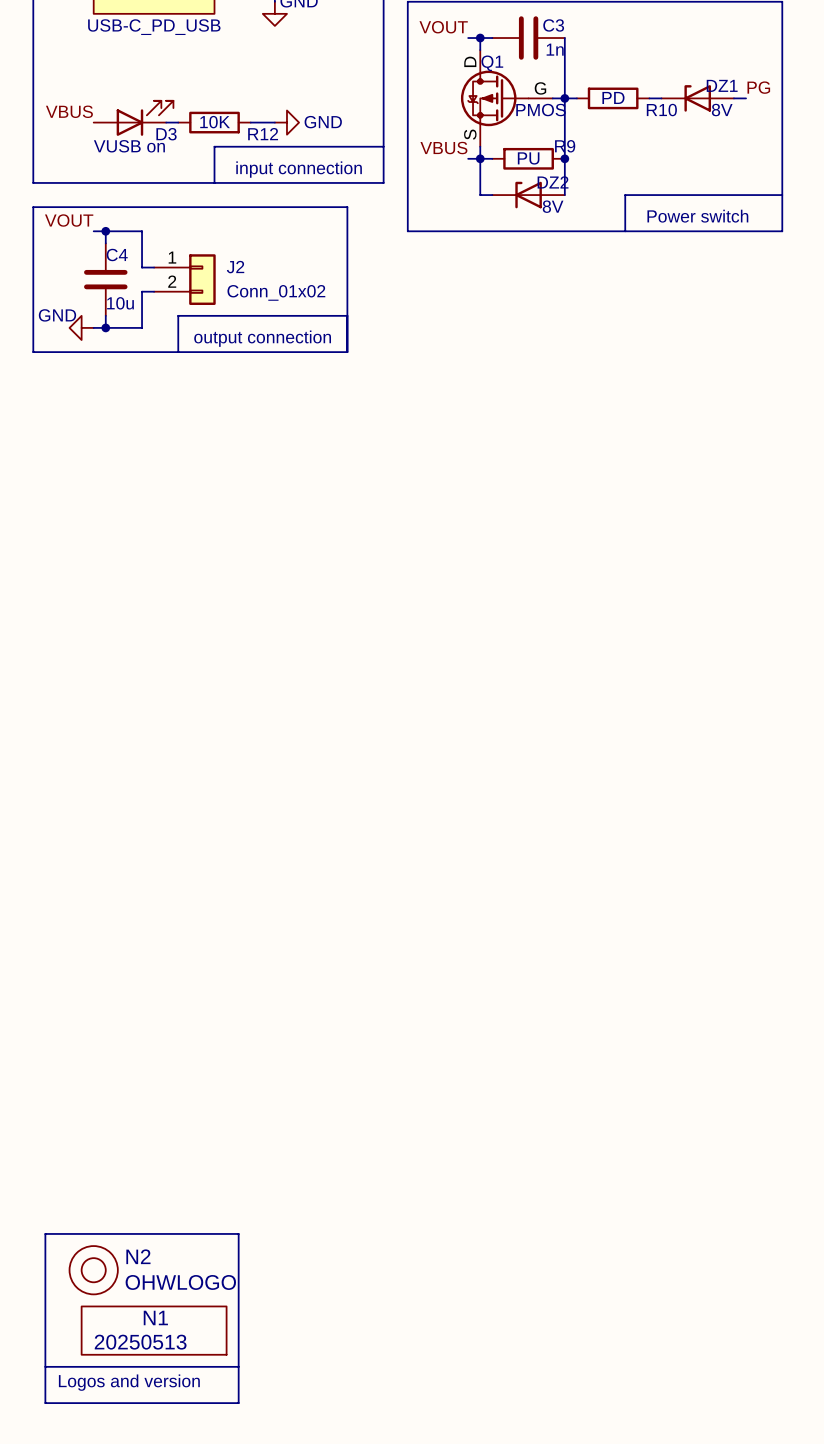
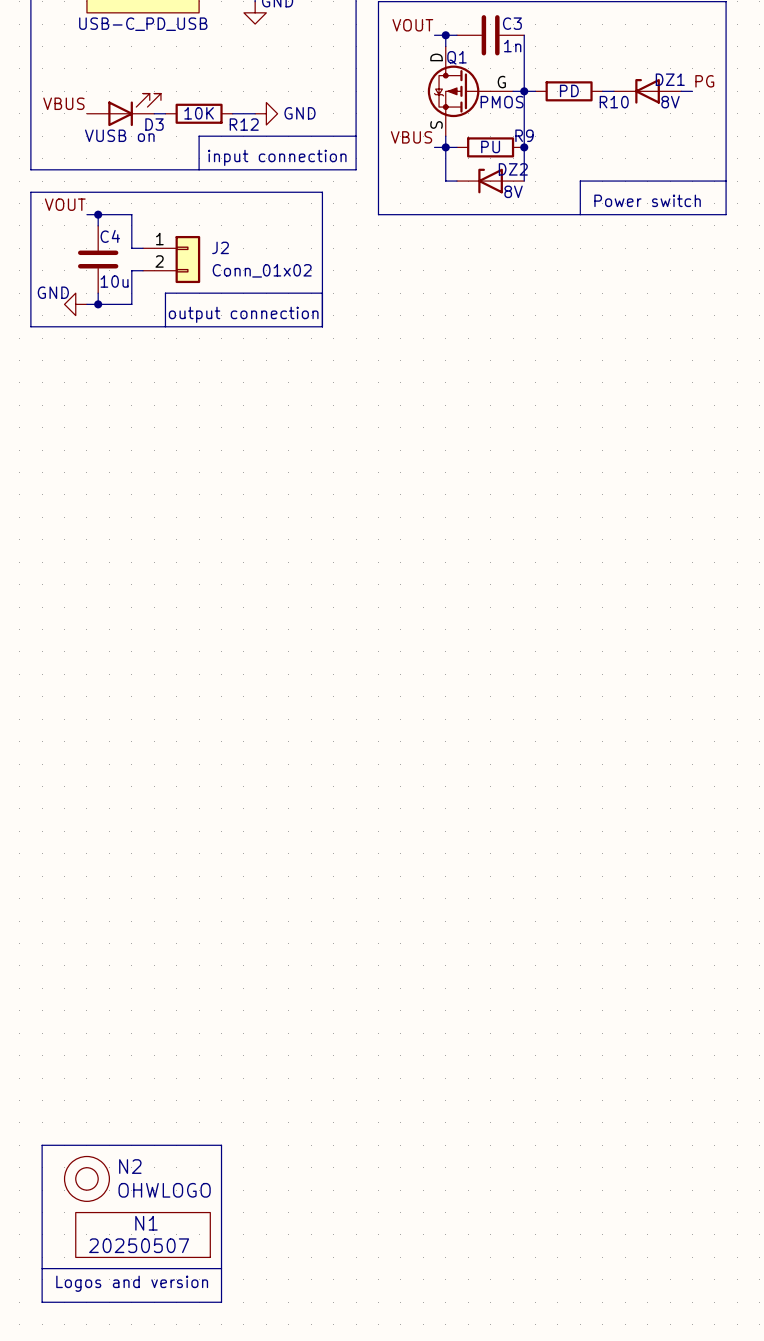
N1 value: 20250513 (140, 1342) -> 20250507 (139, 1245)

